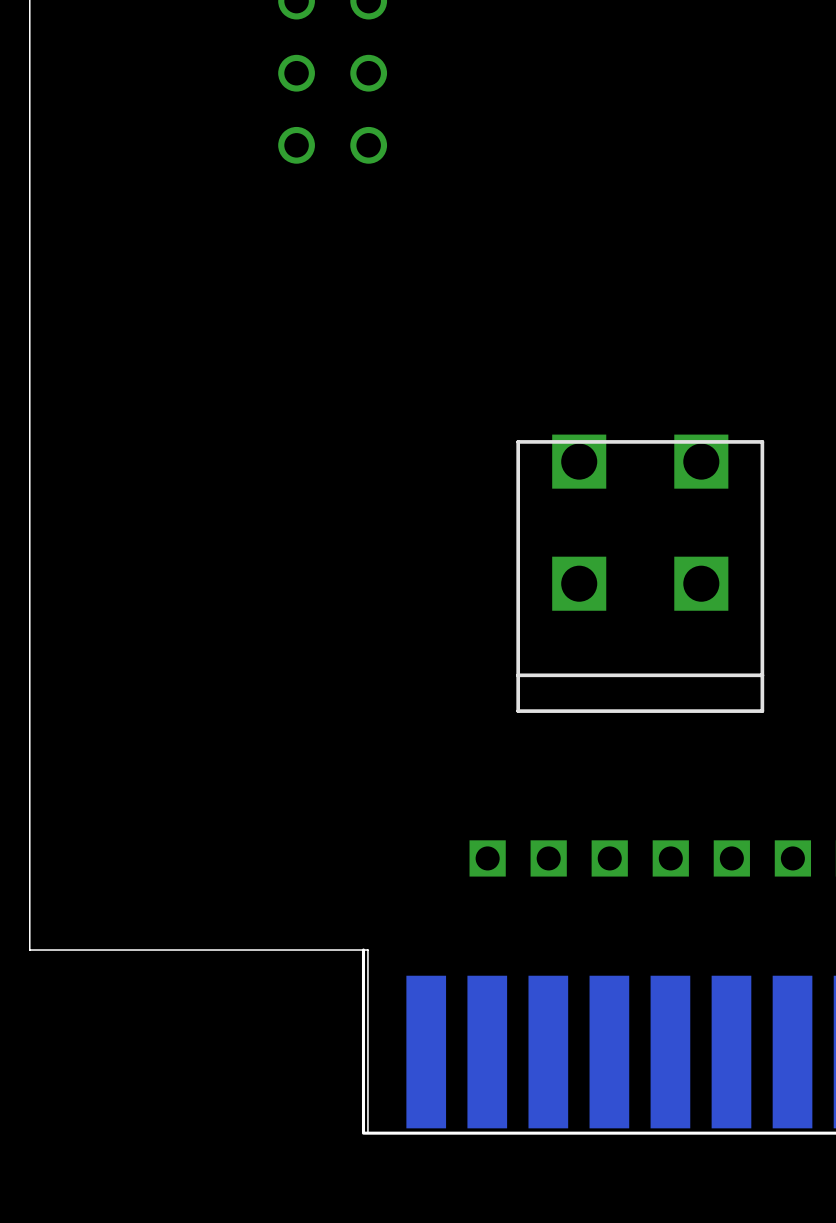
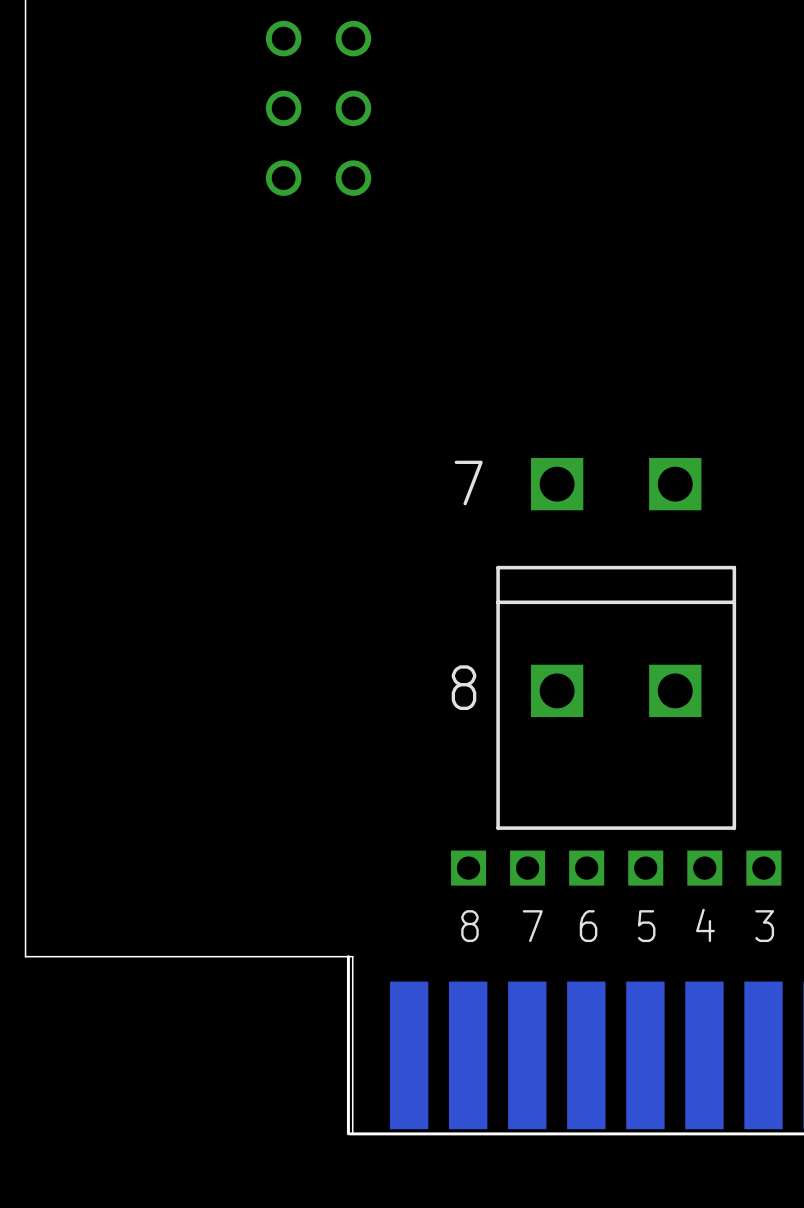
text: none -> 7 (468, 483)
part rotation: 0° (640, 576) -> 180° (616, 697)
text: none -> 8 (464, 687)
text: none -> 4 (705, 925)
text: none -> 8 (469, 926)
text: none -> 7 (532, 926)
text: none -> 6 (588, 926)
text: none -> 5 (646, 926)
text: none -> 3 (764, 926)

